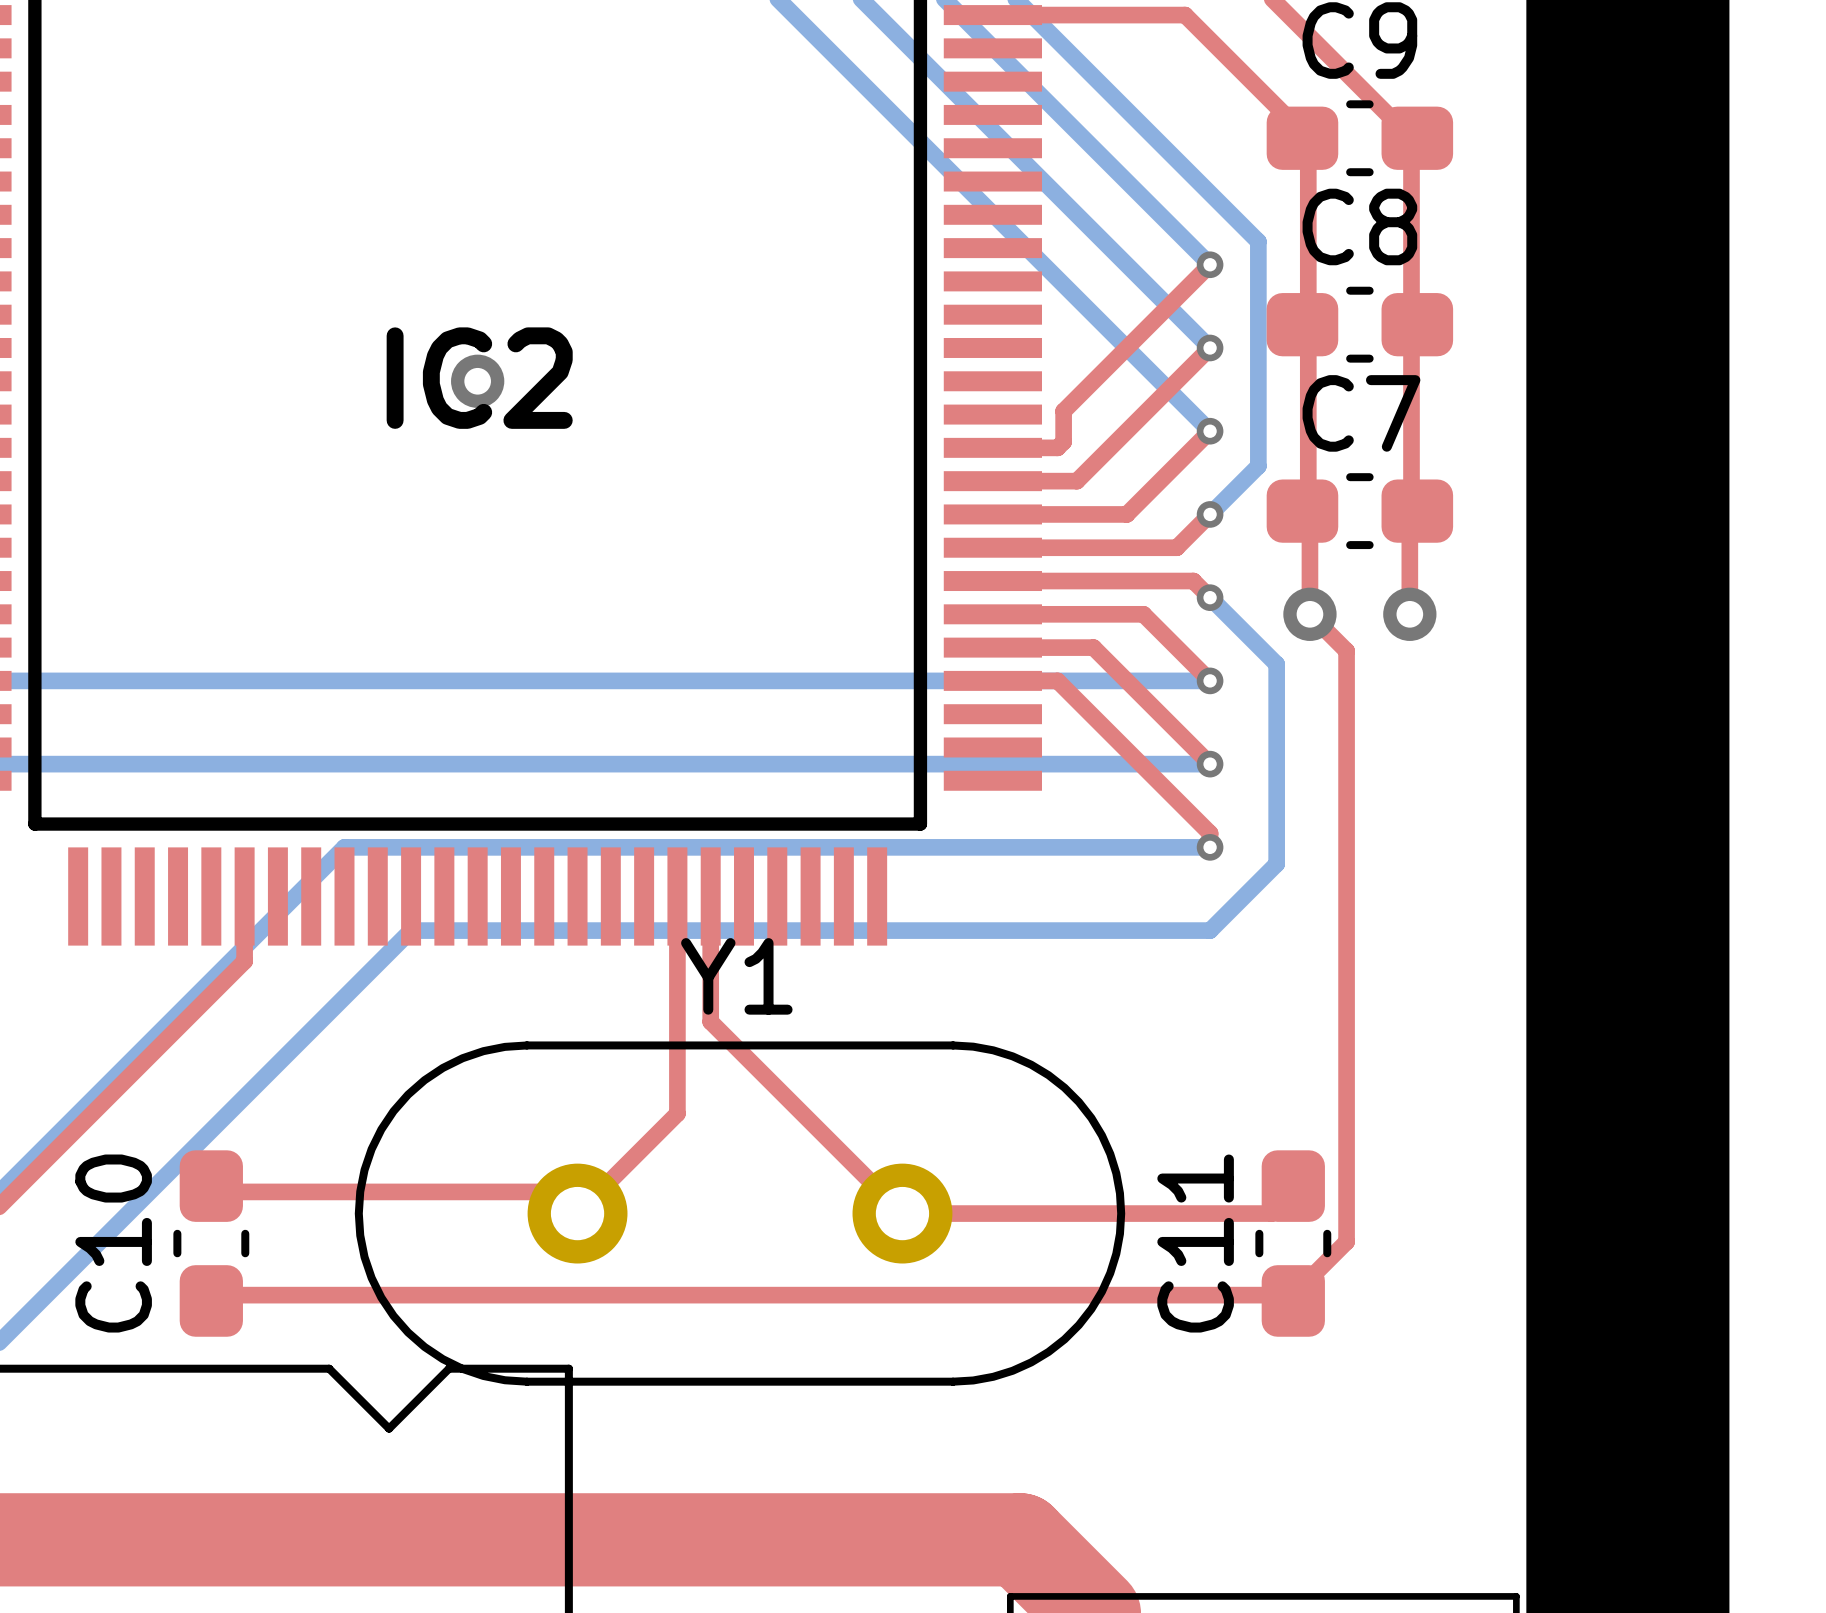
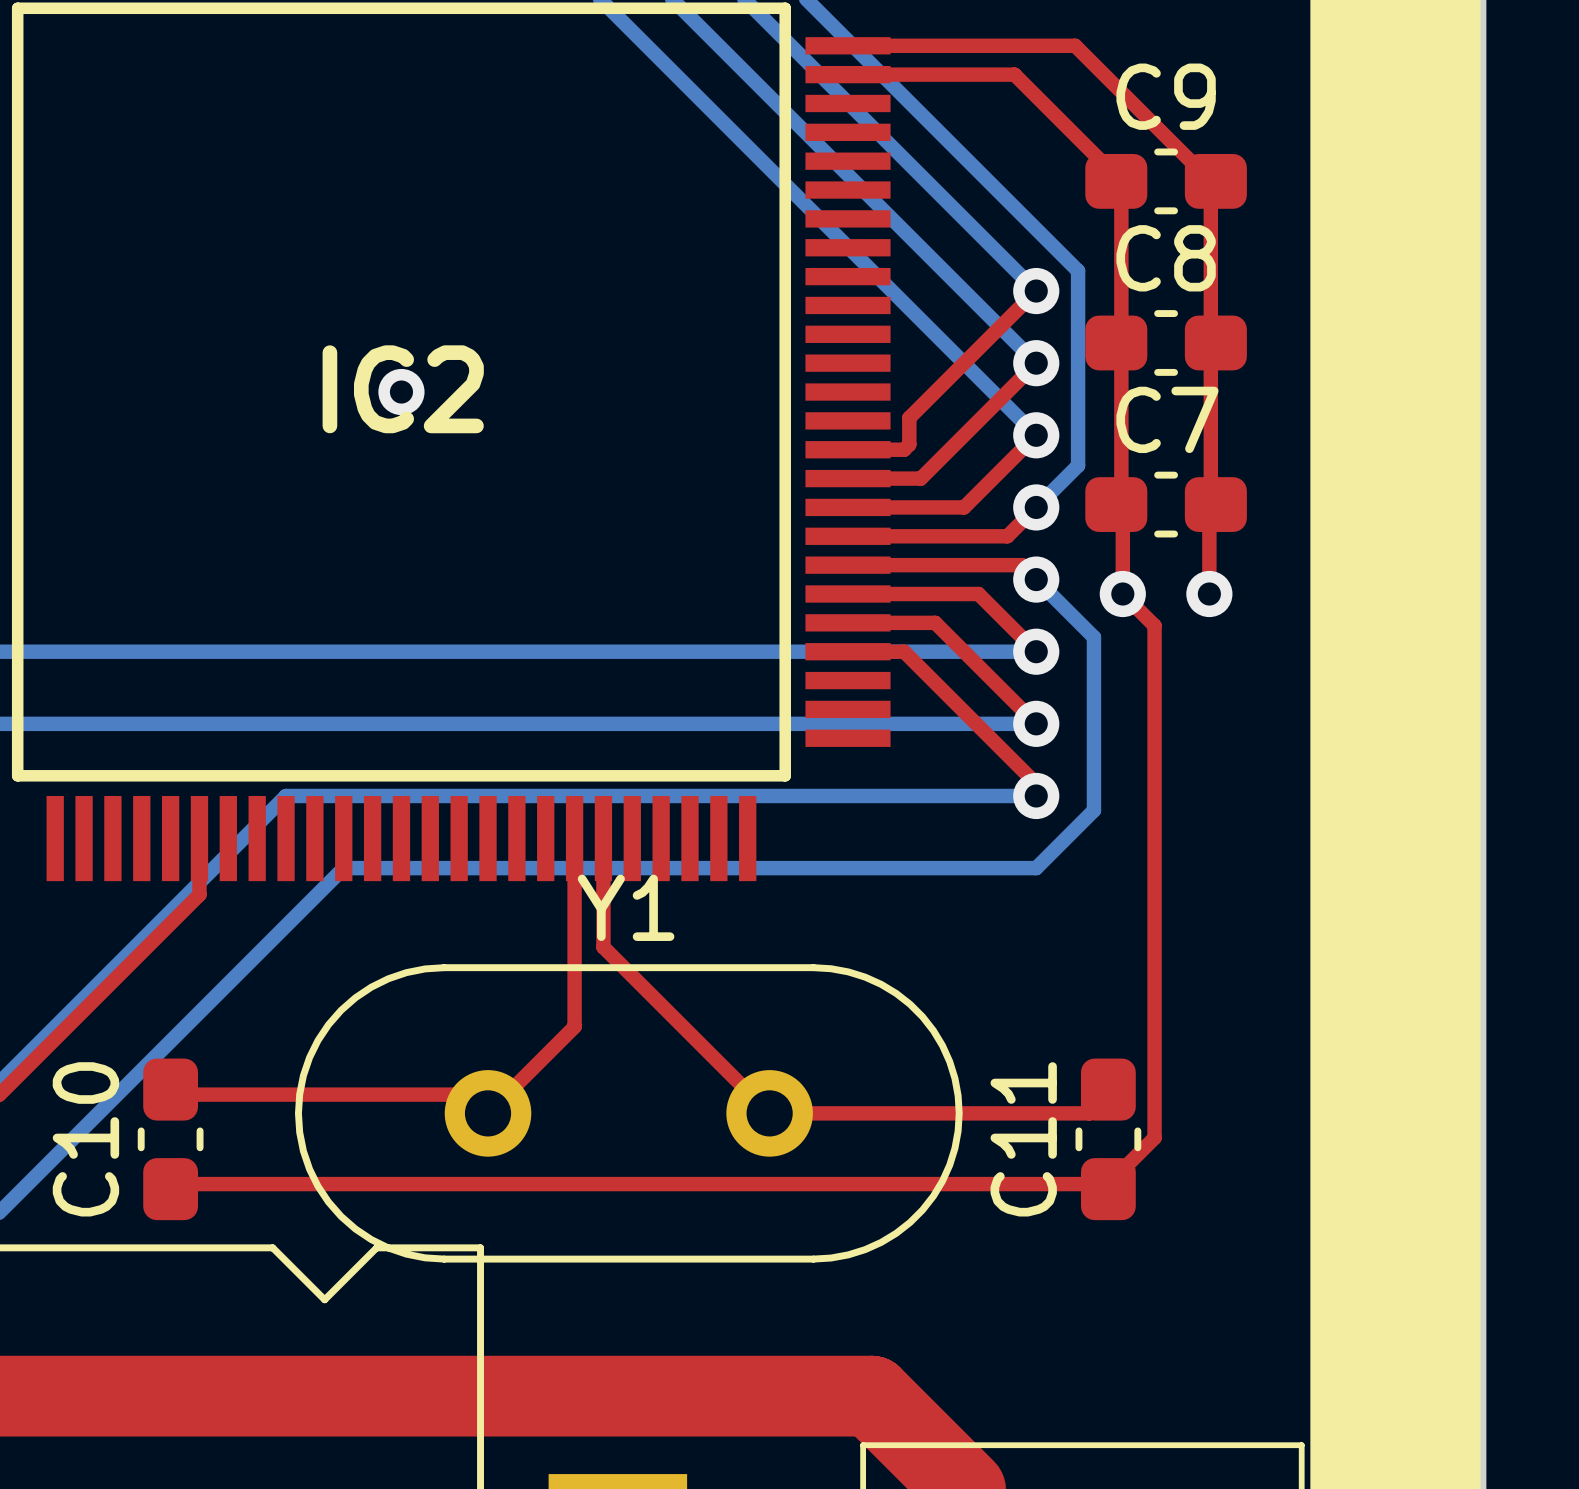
via size: [1196, 251, 1224, 279] -> [1013, 267, 1060, 315]
via size: [1196, 334, 1224, 362] -> [1013, 340, 1060, 387]
via size: [1196, 417, 1224, 445] -> [1013, 412, 1060, 459]
via size: [1196, 501, 1224, 528] -> [1013, 484, 1060, 531]
via size: [1196, 584, 1224, 611] -> [1013, 556, 1060, 603]
via size: [1196, 667, 1224, 695] -> [1013, 628, 1060, 675]
via size: [1196, 750, 1224, 778] -> [1013, 700, 1060, 747]
via size: [1196, 834, 1224, 861] -> [1013, 772, 1060, 820]

